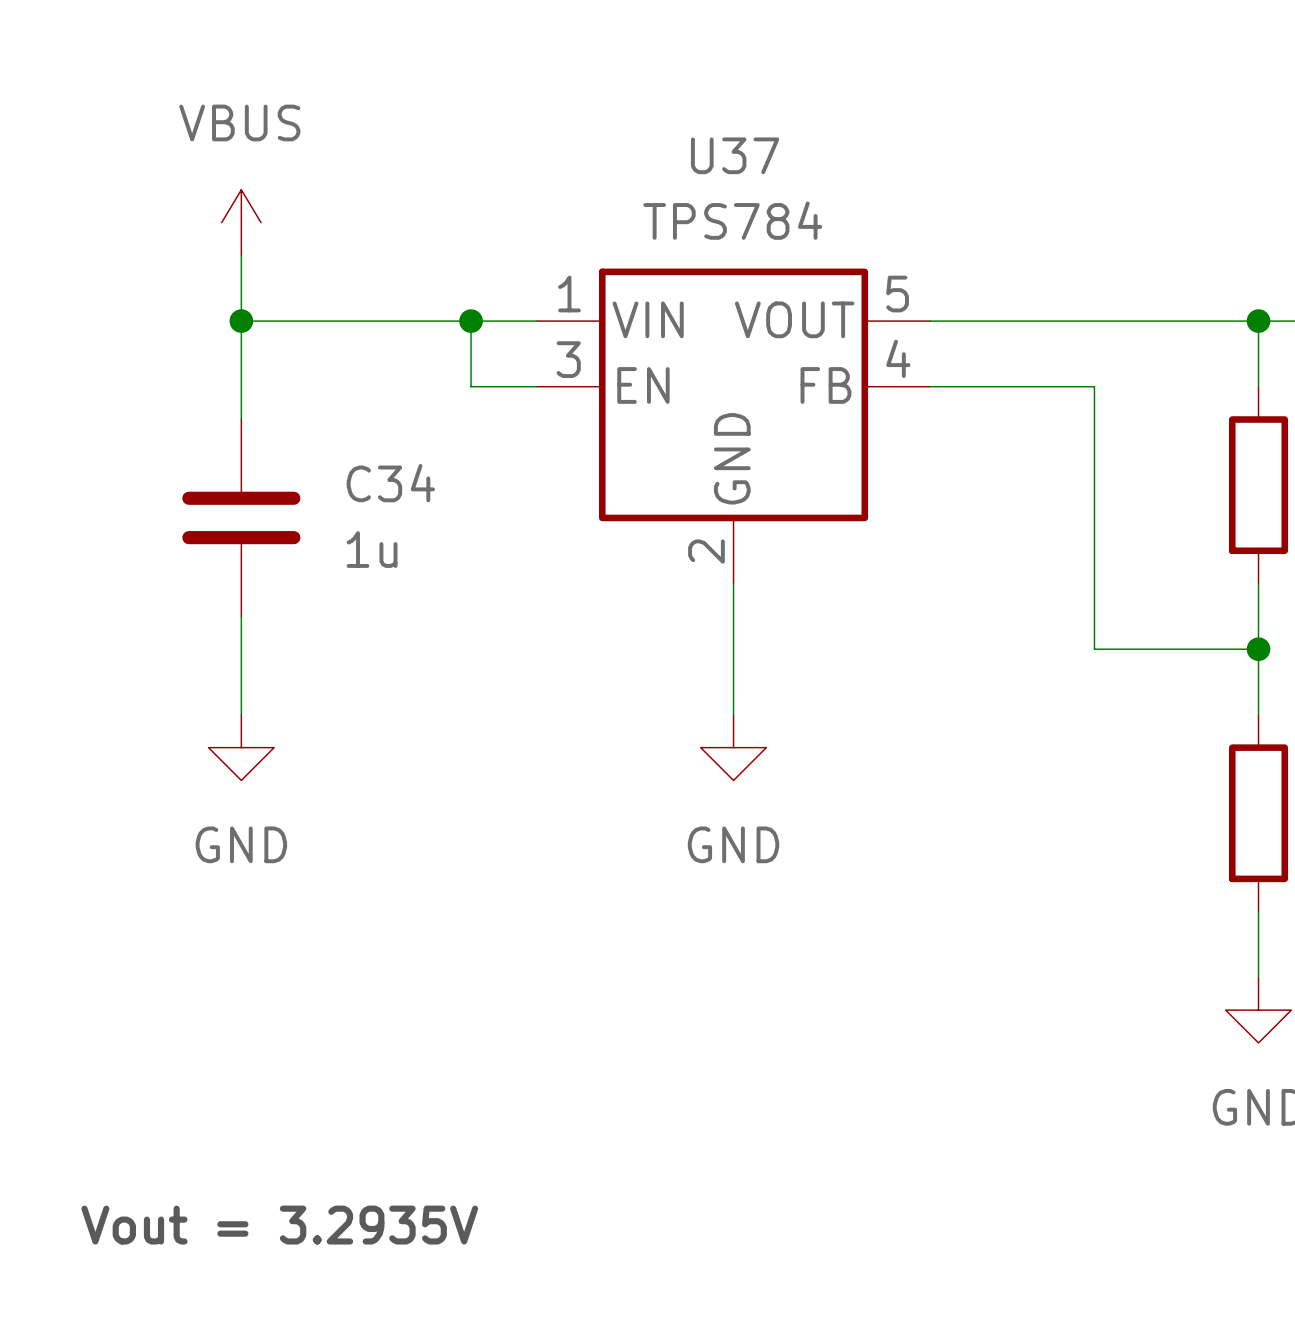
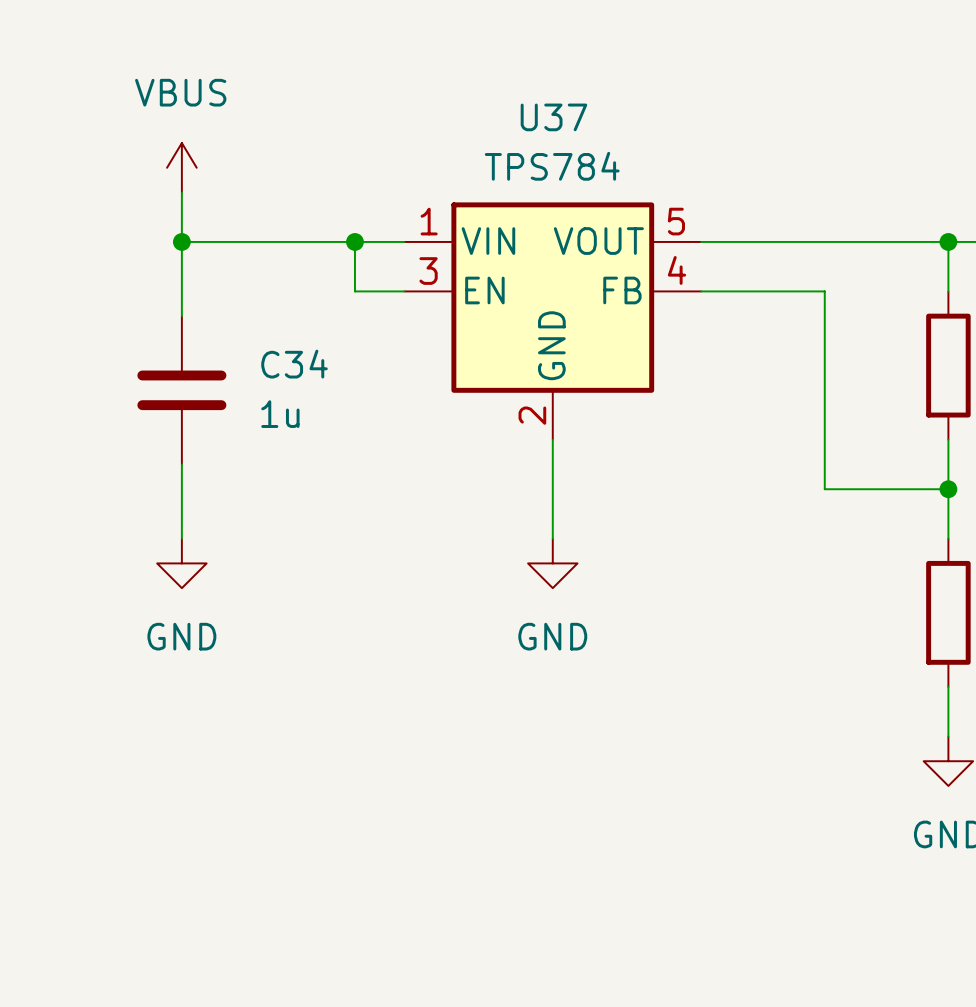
text: Vout = 3.2935V (279, 1225) -> none

